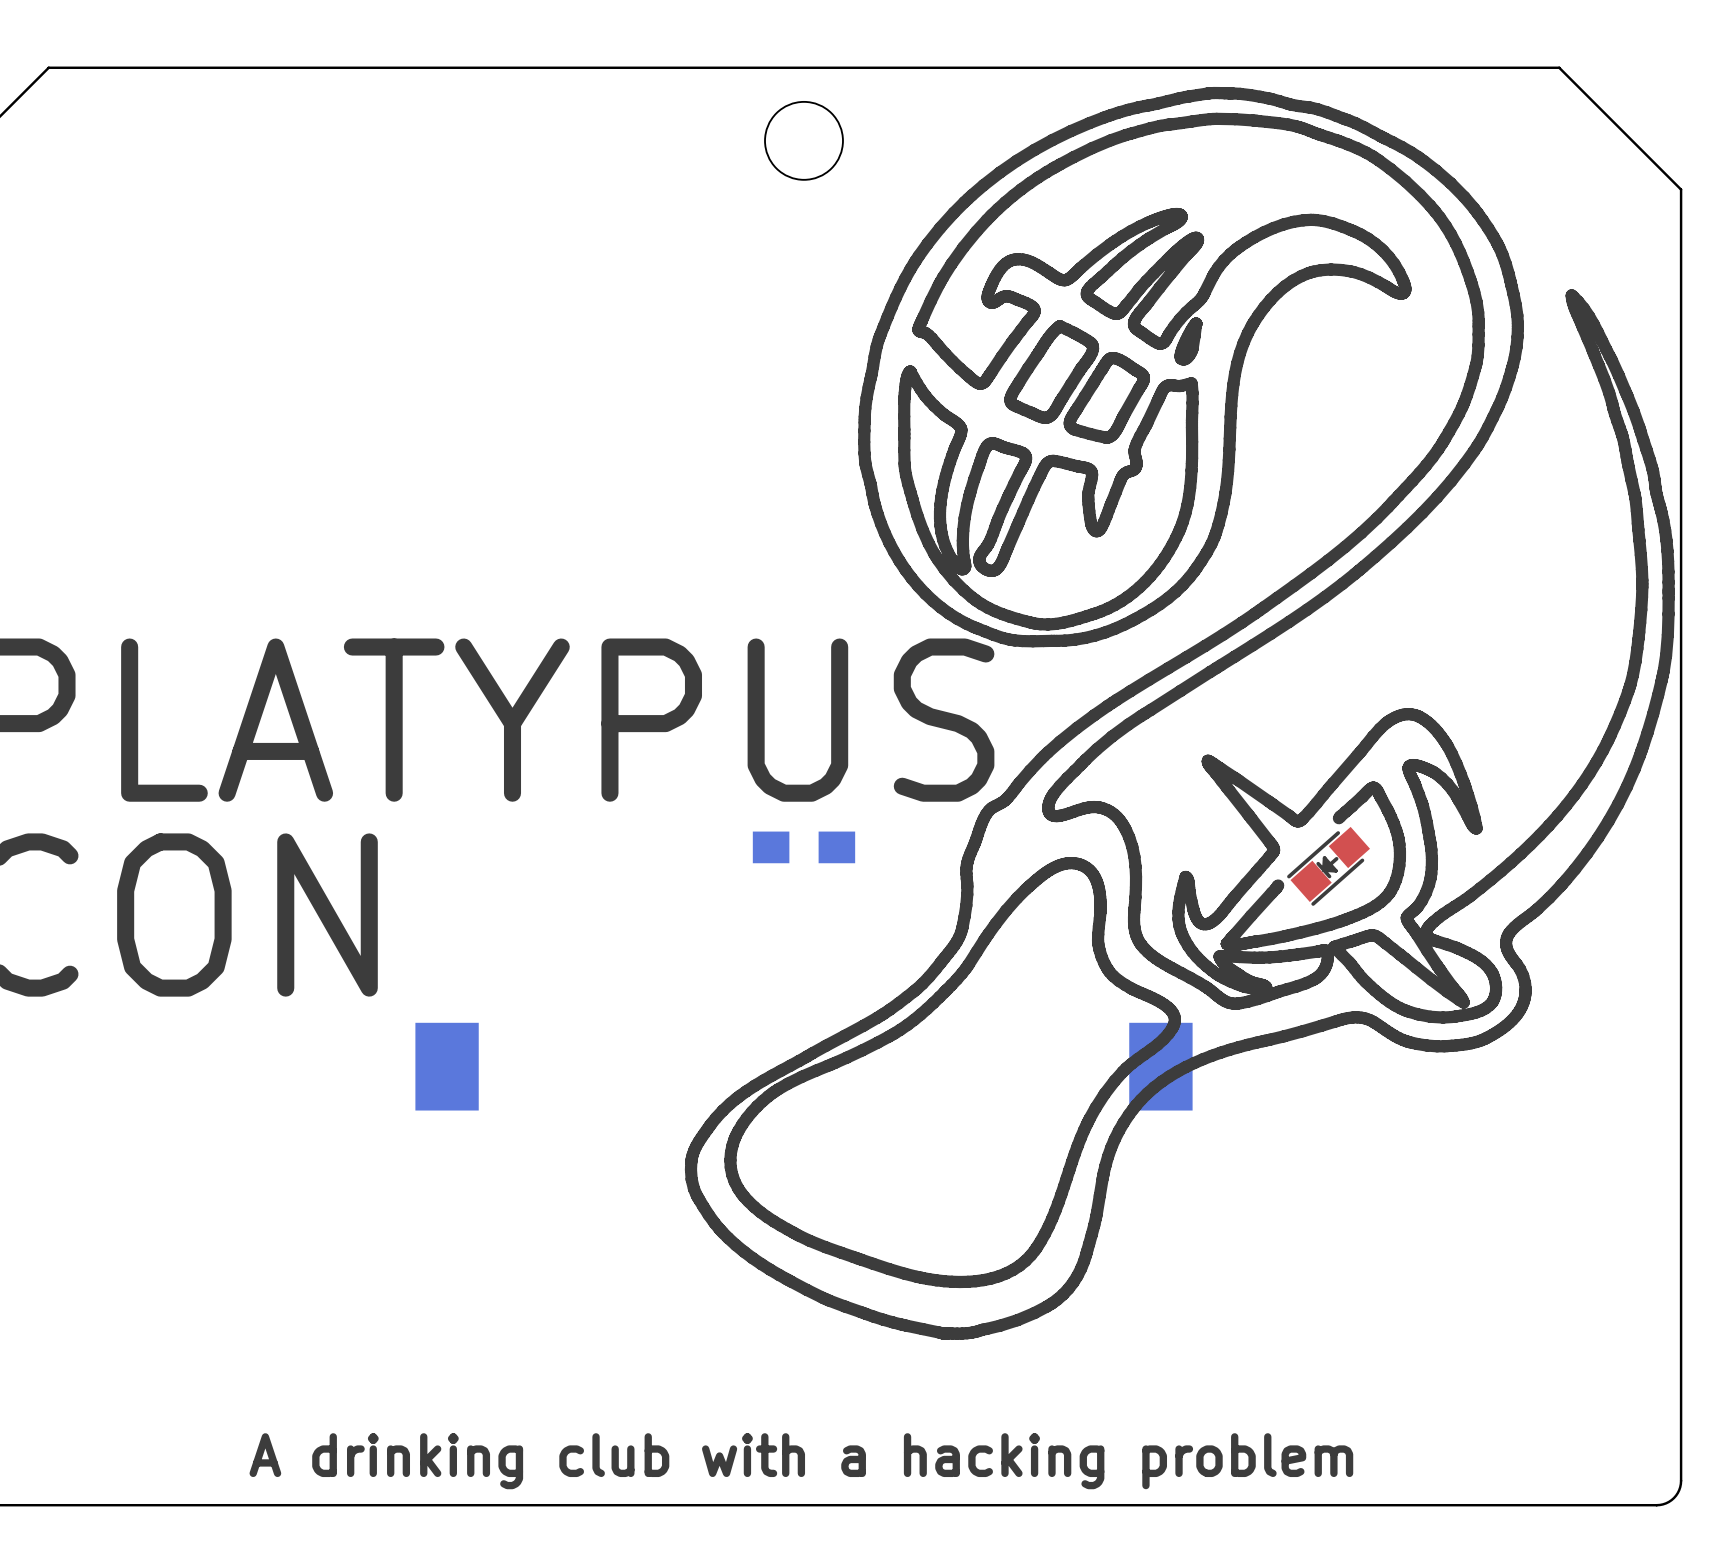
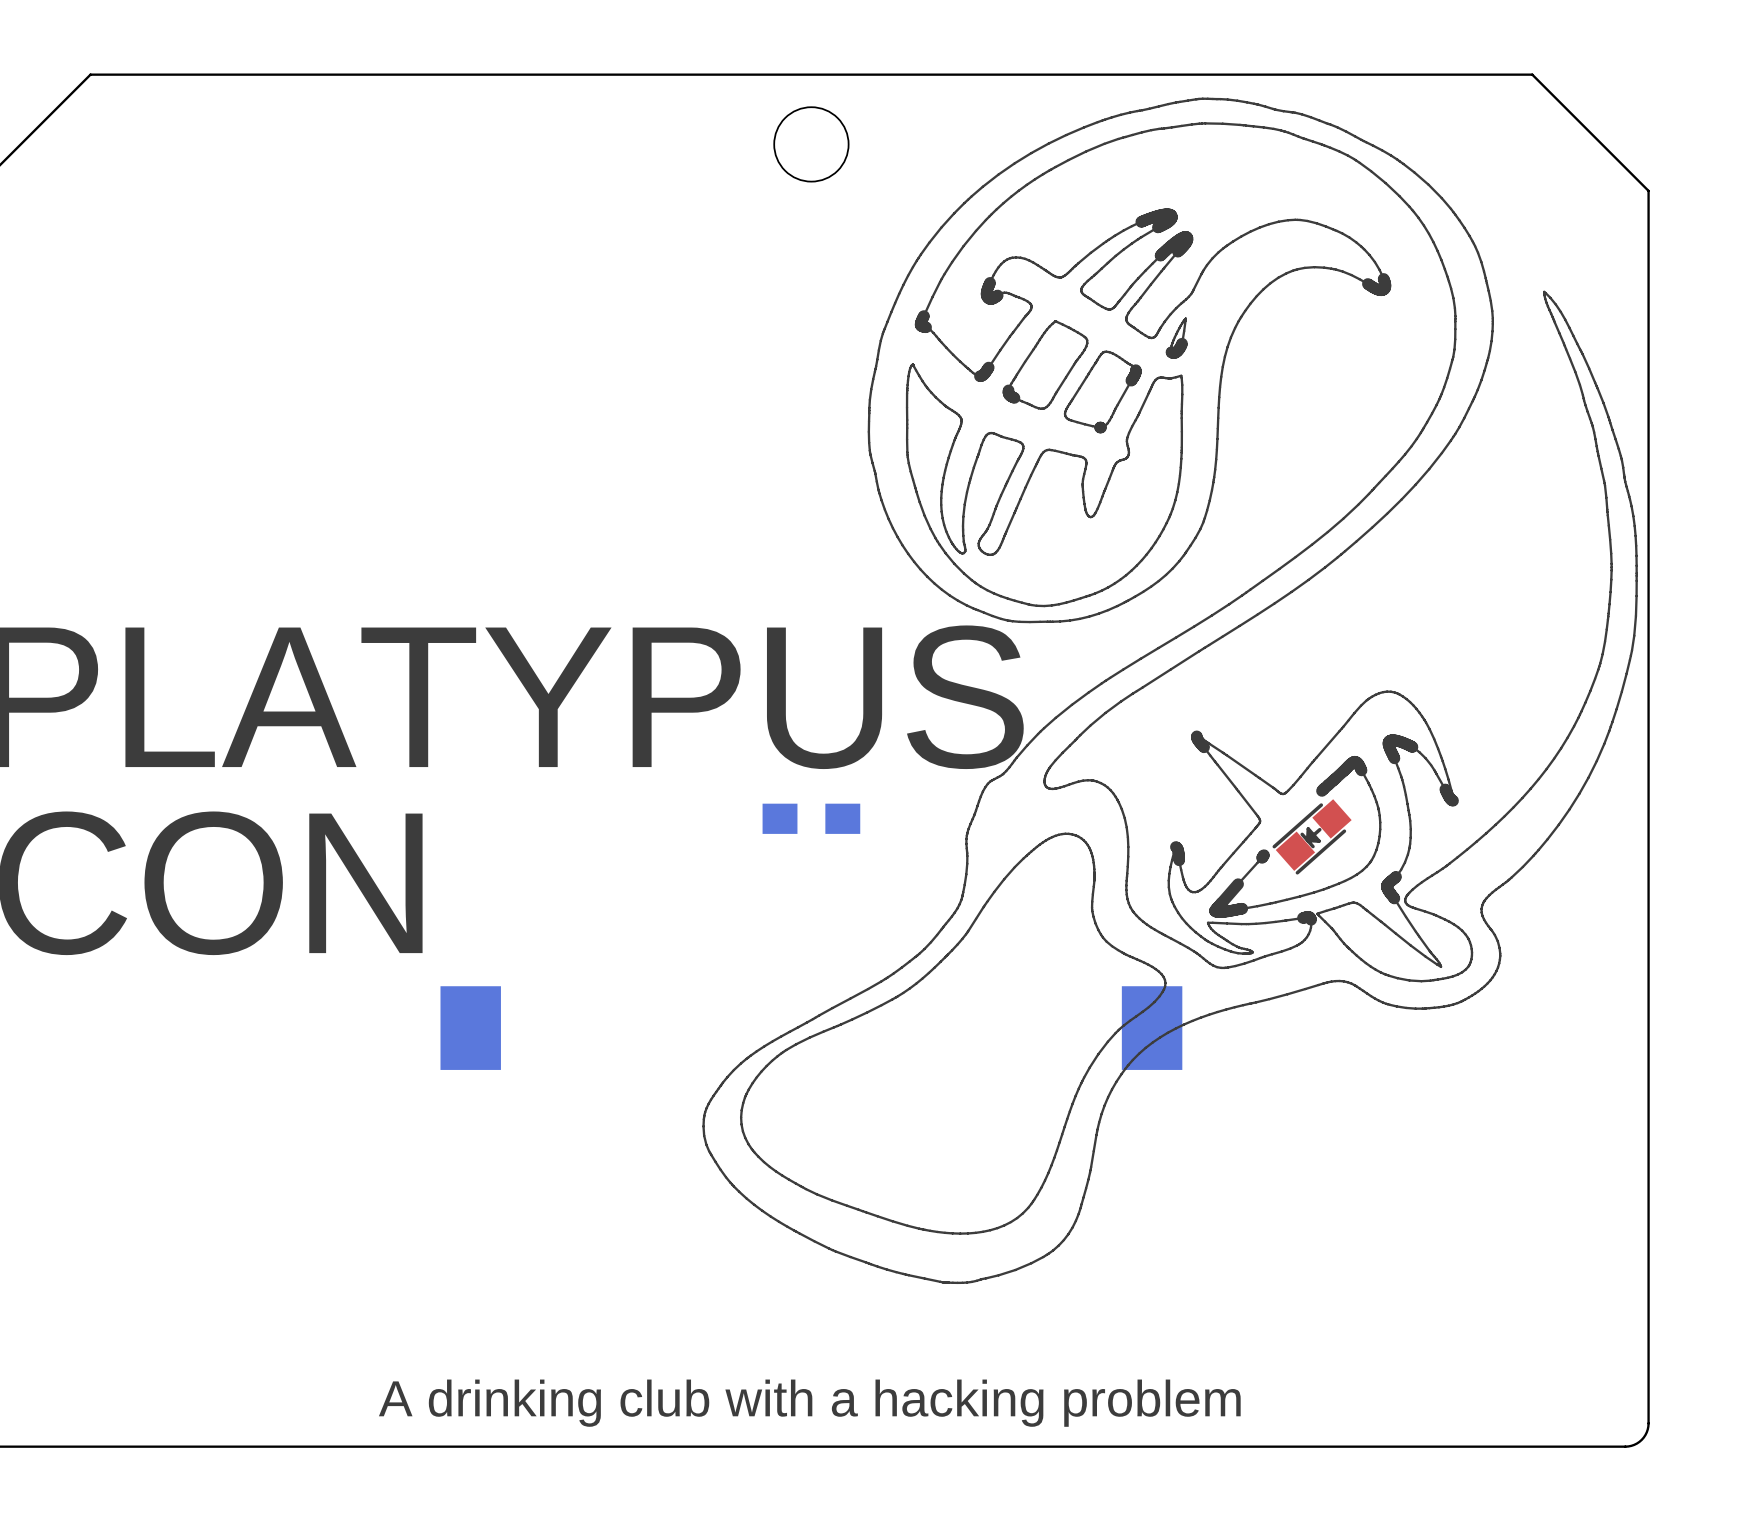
line width: thick (1149, 222) (1110, 244) (1066, 279) (1057, 278) (1032, 262) (1018, 259) (1009, 261) (1002, 266) (991, 285) -> thin (1141, 222) (1103, 243) (1061, 277) (1053, 275) (1029, 260) (1015, 257) (1007, 259) (1001, 264) (990, 282)
line width: thick (1166, 228) (1131, 250) (1089, 287) (1086, 295) (1094, 301) -> thin (1157, 227) (1123, 249) (1084, 284) (1081, 291) (1088, 298)
line width: thick (1187, 253) (1136, 317) (1134, 325) (1141, 332) -> thin (1177, 252) (1128, 312) (1126, 320) (1133, 327)
line width: thick (1169, 257) (1118, 313) (1112, 312) (1095, 302) -> thin (1160, 255) (1112, 308) (1105, 308) (1089, 298)
line width: thick (1403, 281) (1388, 256) (1375, 243) (1360, 234) (1323, 221) (1310, 219) (1293, 221) (1263, 232) (1230, 253) (1214, 273) (1201, 297) (1179, 319) (1163, 342) (1157, 342) (1141, 332) -> thin (1383, 278) (1369, 254) (1356, 242) (1342, 233) (1307, 220) (1278, 221) (1250, 231) (1218, 252) (1203, 270) (1191, 294) (1170, 314) (1154, 336) (1148, 337) (1133, 327)
line width: thick (1386, 286) (1353, 272) (1320, 270) (1308, 273) (1293, 280) (1270, 299) (1247, 333) (1237, 363) (1232, 395) (1225, 489) (1218, 524) (1211, 544) (1189, 577) (1167, 598) (1124, 624) (1085, 637) (1032, 641) (1002, 637) (957, 618) (925, 593) (899, 561) (889, 542) (877, 513) (865, 461) (865, 408) (876, 346) (887, 316) (910, 269) (940, 227) (971, 195) (1016, 160) (1070, 131) (1111, 115) (1178, 98) (1214, 93) (1250, 95) (1317, 109) (1355, 123) (1411, 152) (1450, 183) (1474, 208) (1493, 236) (1502, 254) (1515, 304) (1517, 328) (1514, 357) (1505, 387) (1487, 427) (1474, 451) (1451, 481) (1422, 512) (1354, 573) (1289, 621) (1112, 736) (1059, 785) (1052, 796) (1048, 805) (1049, 812) (1054, 815) (1093, 807) (1107, 810) (1117, 817) (1129, 837) (1134, 856) (1136, 876) (1134, 922) (1138, 940) (1155, 958) (1205, 986) (1225, 1001) (1233, 1003) (1248, 1001) (1312, 980) (1325, 968) (1327, 953) -> thin (1367, 283) (1336, 269) (1304, 267) (1292, 270) (1278, 277) (1256, 296) (1235, 328) (1224, 356) (1220, 387) (1214, 477) (1207, 510) (1200, 529) (1179, 561) (1158, 581) (1117, 606) (1079, 618) (1029, 622) (1001, 618) (958, 600) (927, 576) (902, 545) (881, 500) (869, 450) (869, 399) (880, 340) (891, 312) (912, 267) (941, 227) (971, 196) (1014, 163) (1066, 135) (1104, 119) (1168, 104) (1202, 98) (1237, 100) (1301, 114) (1337, 127) (1391, 155) (1428, 184) (1450, 208) (1469, 235) (1478, 252) (1490, 300) (1492, 323) (1489, 350) (1481, 380) (1464, 418) (1450, 440) (1429, 469) (1401, 499) (1337, 557) (1274, 603) (1105, 712) (1055, 760) (1048, 769) (1044, 779) (1045, 785) (1050, 788) (1087, 780) (1100, 783) (1110, 790) (1121, 809) (1126, 827) (1128, 847) (1126, 890) (1130, 907) (1146, 924) (1194, 951) (1213, 965) (1221, 967) (1235, 966) (1297, 945) (1308, 934) (1311, 920)
line width: thick (999, 298) (1010, 296) (1032, 307) (1034, 313) (1028, 321) -> thin (998, 295) (1008, 293) (1029, 303) (1031, 308) (1025, 316)
line width: thick (922, 320) (938, 285) (951, 264) (986, 220) (1029, 183) (1073, 157) (1125, 135) (1168, 124) (1216, 118) (1288, 124) (1341, 141) (1372, 156) (1420, 194) (1445, 226) (1467, 271) (1478, 312) (1477, 355) (1464, 402) -> thin (924, 315) (952, 262) (985, 219) (1026, 184) (1068, 160) (1118, 139) (1159, 128) (1205, 123) (1273, 128) (1324, 145) (1354, 159) (1399, 196) (1423, 225) (1444, 269) (1454, 308) (1454, 349) (1441, 394)
line width: thick (1027, 321) (990, 374) -> thin (1025, 316) (988, 367)
line width: thick (924, 332) (959, 368) (980, 383) -> thin (926, 327) (960, 361) (979, 376)
line width: thick (1192, 349) (1196, 323) (1184, 342) (1181, 358) -> thin (1182, 343) (1185, 318) (1174, 337) (1171, 352)
line width: thick (909, 371) (906, 379) (904, 399) (904, 468) (917, 515) (928, 543) (938, 560) (953, 580) (976, 600) (1002, 614) (1040, 624) (1071, 620) (1114, 605) (1145, 581) (1168, 551) (1182, 522) (1190, 487) (1192, 458) (1191, 383) (1179, 386) (1167, 385) (1162, 390) (1135, 448) (1136, 466) (1121, 477) (1099, 529) (1096, 531) (1093, 529) (1090, 517) (1088, 496) (1092, 476) (1090, 470) (1051, 461) (1045, 465) (1038, 478) (1001, 563) (995, 569) (991, 570) (980, 565) (979, 556) (990, 539) (1026, 457) (1018, 451) (995, 443) (989, 444) (982, 455) (967, 505) (962, 540) (964, 567) (959, 568) (951, 559) -> thin (912, 364) (909, 372) (907, 390) (907, 457) (919, 502) (930, 528) (954, 563) (976, 583) (1000, 596) (1036, 605) (1066, 602) (1108, 587) (1136, 565) (1159, 536) (1172, 508) (1179, 475) (1181, 375) (1170, 378) (1158, 377) (1153, 382) (1127, 437) (1128, 455) (1114, 465) (1093, 515) (1088, 515) (1084, 503) (1082, 484) (1086, 464) (1085, 459) (1047, 450) (1041, 454) (1035, 466) (999, 547) (994, 553) (990, 554) (980, 549) (979, 541) (989, 524) (1023, 446) (1016, 440) (993, 433) (988, 433) (981, 444) (967, 492) (963, 526) (964, 551) (960, 552) (952, 544)
line width: thick (910, 371) (929, 400) (958, 424) (961, 429) (945, 475) (940, 504) (941, 532) (951, 559) -> thin (912, 364) (931, 392) (959, 415) (961, 420) (946, 464) (941, 491) (942, 518) (952, 543)
line width: thick (1143, 377) (1119, 359) (1109, 358) (1072, 415) (1070, 425) (1076, 430) (1109, 437) (1116, 429) (1139, 388) -> thin (1135, 369) (1112, 353) (1102, 352) (1067, 406) (1065, 416) (1071, 420) (1102, 427) (1109, 420) (1131, 380)
line width: thick (1010, 398) (1045, 341) (1059, 326) (1091, 343) (1093, 349) (1090, 356) (1050, 415) (1041, 417) (1017, 406) -> thin (1008, 389) (1042, 336) (1055, 321) (1086, 338) (1087, 343) (1084, 350) (1046, 406) (1038, 408) (1014, 398)
line width: thick (1462, 407) (1442, 442) (1426, 465) (1376, 518) (1345, 546) (1241, 622) (1116, 699) (1076, 728) (1041, 758) (1005, 799) (988, 810) (981, 823) (967, 862) (966, 905) (961, 932) (951, 949) (922, 983) (877, 1017) (763, 1080) (740, 1095) (715, 1118) (696, 1146) (691, 1158) (690, 1169) (696, 1195) (719, 1228) (752, 1258) (785, 1278) (829, 1300) (892, 1322) (947, 1333) -> thin (1439, 398) (1420, 432) (1405, 454) (1358, 504) (1327, 532) (1229, 604) (1110, 677) (1071, 704) (1038, 734) (1003, 773) (987, 783) (980, 796) (967, 832) (966, 874) (961, 899) (951, 916) (924, 949) (881, 981) (772, 1041) (750, 1055) (727, 1077) (708, 1103) (704, 1115) (703, 1126) (709, 1151) (730, 1182) (762, 1210) (794, 1230) (835, 1251) (896, 1272) (948, 1282)
line width: thick (1207, 760) (1295, 820) (1300, 820) -> thin (1196, 736) (1280, 793) (1285, 792)
line width: thick (1215, 772) (1271, 845) (1273, 850) (1219, 915) (1210, 922) (1203, 924) (1197, 919) (1189, 891) -> thin (1204, 747) (1258, 816) (1260, 822) (1207, 883) (1199, 890) (1192, 892) (1186, 887) (1179, 860)
line width: thick (1433, 772) (1453, 791) (1467, 816) -> thin (1412, 747) (1431, 765) (1445, 789)
line width: thick (1415, 784) (1424, 813) (1431, 858) (1429, 884) (1416, 907) -> thin (1394, 758) (1404, 786) (1410, 829) (1407, 854) (1396, 876)
line width: thick (1380, 797) (1393, 823) (1399, 851) (1396, 879) (1385, 897) (1369, 909) (1340, 921) (1301, 932) (1255, 941) -> thin (1361, 770) (1374, 796) (1380, 822) (1376, 849) (1366, 866) (1350, 878) (1323, 889) (1286, 899) (1242, 908)
line width: thick (1301, 819) (1379, 728) (1395, 717) (1411, 714) (1420, 717) (1431, 725) (1447, 746) (1464, 784) (1476, 828) -> thin (1286, 792) (1361, 705) (1375, 694) (1390, 691) (1399, 694) (1410, 702) (1425, 722) (1441, 758) (1453, 800)
line width: thick (1070, 863) (1059, 865) (1046, 872) (1017, 898) (995, 924) (962, 973) (914, 1019) (877, 1042) (788, 1083) (768, 1096) (751, 1112) (735, 1135) (730, 1160) (734, 1181) (741, 1193) (754, 1207) (773, 1221) (809, 1240) (888, 1269) (928, 1279) (959, 1282) (991, 1278) (1013, 1269) (1031, 1255) (1052, 1218) (1080, 1137) (1095, 1107) (1122, 1071) (1163, 1039) (1172, 1028) (1174, 1019) (1172, 1013) (1164, 1004) (1125, 984) (1107, 968) (1101, 957) (1098, 942) (1100, 909) (1097, 883) (1093, 874) (1086, 868) (1070, 863) -> thin (1065, 833) (1055, 835) (1042, 842) (1014, 867) (994, 891) (962, 938) (916, 983) (881, 1005) (796, 1044) (777, 1056) (761, 1071) (746, 1094) (741, 1117) (745, 1137) (751, 1149) (763, 1162) (782, 1175) (816, 1194) (892, 1221) (930, 1230) (960, 1233) (990, 1230) (1010, 1222) (1028, 1207) (1048, 1173) (1075, 1096) (1089, 1067) (1115, 1033) (1154, 1002) (1162, 991) (1165, 983) (1163, 976) (1155, 969) (1118, 950) (1100, 934) (1092, 909) (1094, 877) (1091, 853) (1081, 838) (1065, 833)
line width: thick (1185, 876) (1178, 912) (1180, 931) (1196, 956) (1223, 978) (1250, 988) (1266, 987) (1250, 981) (1233, 971) (1224, 964) (1219, 956) (1269, 957) (1318, 951) -> thin (1175, 846) (1168, 880) (1171, 898) (1186, 923) (1212, 943) (1238, 953) (1252, 952) (1237, 946) (1221, 936) (1213, 930) (1208, 922) (1256, 923) (1302, 918)
line width: thick (1275, 888) (1251, 915) -> thin (1261, 858) (1238, 884)
line width: thick (1415, 931) (1463, 1002) (1375, 935) (1366, 936) (1334, 946) (1375, 990) (1404, 1010) (1430, 1016) (1452, 1017) (1475, 1012) (1489, 1005) (1494, 998) (1496, 987) (1493, 976) (1489, 968) (1472, 955) (1429, 938) (1426, 933) (1427, 928) (1438, 917) (1468, 897) (1511, 862) (1539, 835) (1566, 805) (1589, 773) (1607, 741) (1624, 700) (1632, 674) (1638, 635) (1642, 587) (1635, 498) (1622, 436) (1609, 392) (1574, 306) (1571, 295) (1589, 316) (1611, 360) (1633, 411) (1652, 467) (1666, 540) (1667, 634) (1663, 671) (1653, 713) (1634, 769) (1618, 804) (1598, 837) (1575, 869) (1549, 897) (1514, 927) (1506, 937) (1507, 949) (1520, 969) (1525, 982) (1524, 998) (1519, 1010) (1509, 1022) (1496, 1032) (1481, 1040) (1466, 1044) (1437, 1046) (1410, 1042) (1394, 1035) (1370, 1020) (1353, 1017) (1229, 1049) (1202, 1059) (1177, 1071) (1154, 1087) (1140, 1100) (1118, 1130) (1105, 1165) (1095, 1218) (1085, 1255) (1077, 1275) (1068, 1288) (1050, 1304) (1017, 1320) (972, 1332) (943, 1333) -> thin (1394, 898) (1441, 966) (1356, 903) (1348, 903) (1317, 913) (1356, 955) (1384, 974) (1409, 980) (1430, 980) (1452, 976) (1465, 969) (1470, 962) (1472, 952) (1469, 942) (1465, 934) (1449, 921) (1408, 905) (1405, 900) (1406, 896) (1417, 885) (1446, 866) (1486, 833) (1513, 807) (1538, 778) (1561, 748) (1578, 717) (1595, 678) (1602, 654) (1608, 616) (1611, 570) (1605, 485) (1592, 426) (1579, 384) (1546, 302) (1544, 291) (1560, 311) (1582, 354) (1603, 402) (1620, 456) (1634, 526) (1635, 616) (1631, 650) (1621, 691) (1604, 743) (1588, 777) (1569, 809) (1547, 839) (1522, 866) (1489, 895) (1482, 905) (1482, 916) (1494, 935) (1499, 948) (1499, 963) (1494, 974) (1484, 986) (1472, 995) (1457, 1003) (1443, 1006) (1415, 1008) (1389, 1004) (1374, 998) (1351, 983) (1335, 981) (1217, 1011) (1167, 1032) (1145, 1047) (1132, 1059) (1112, 1089) (1099, 1122) (1090, 1172) (1080, 1208) (1072, 1227) (1063, 1240) (1046, 1254) (1015, 1270) (971, 1281) (944, 1282)

